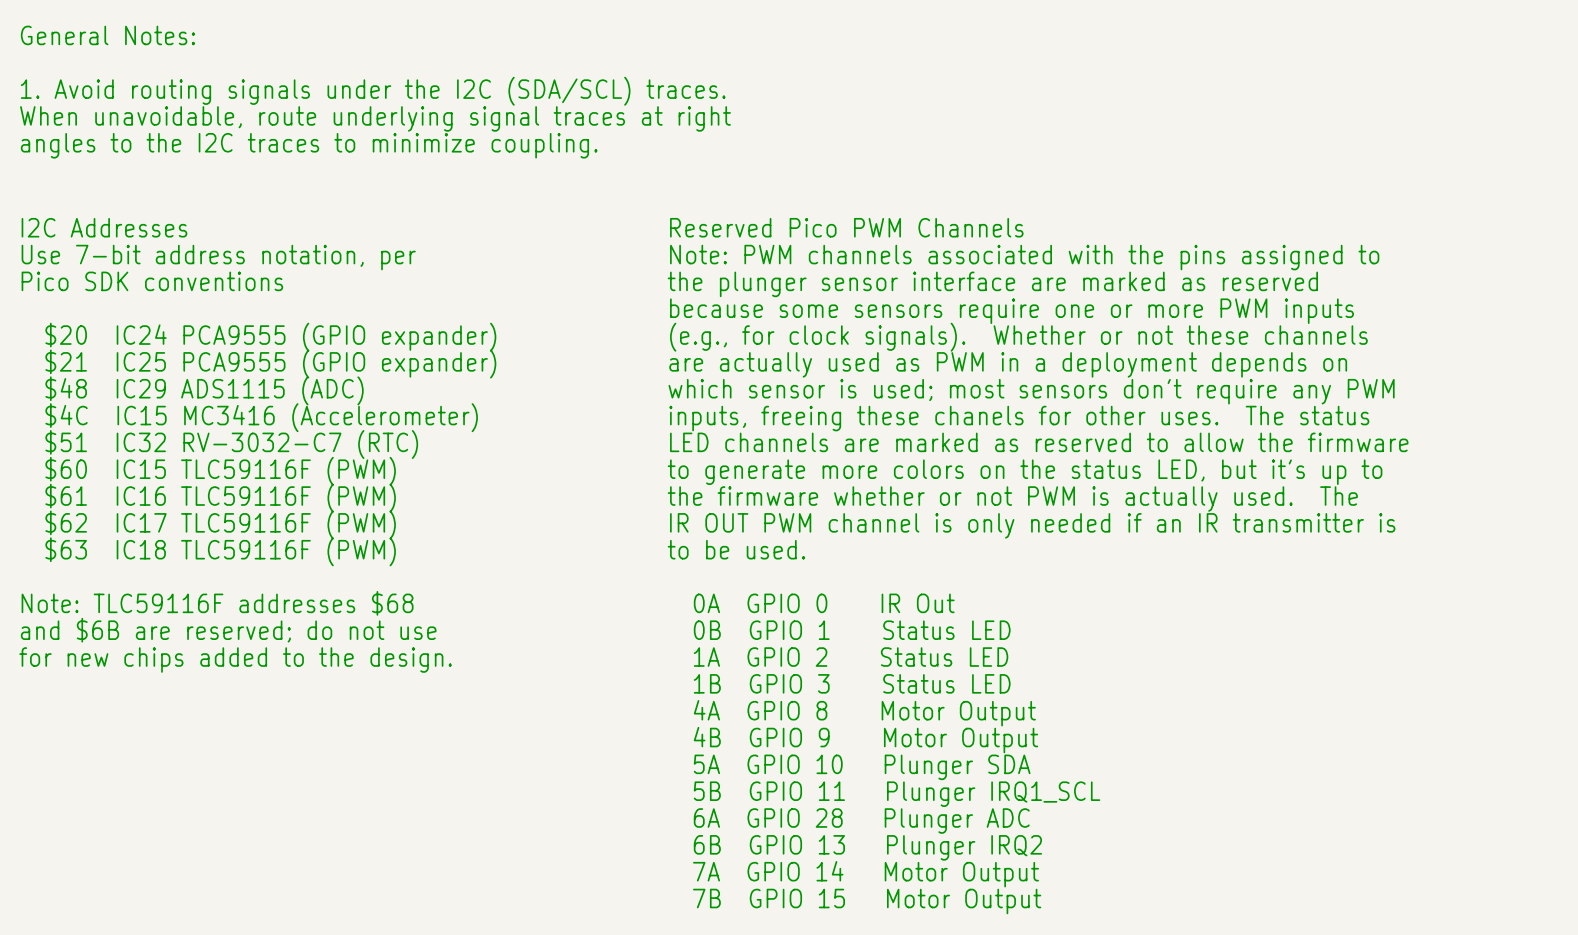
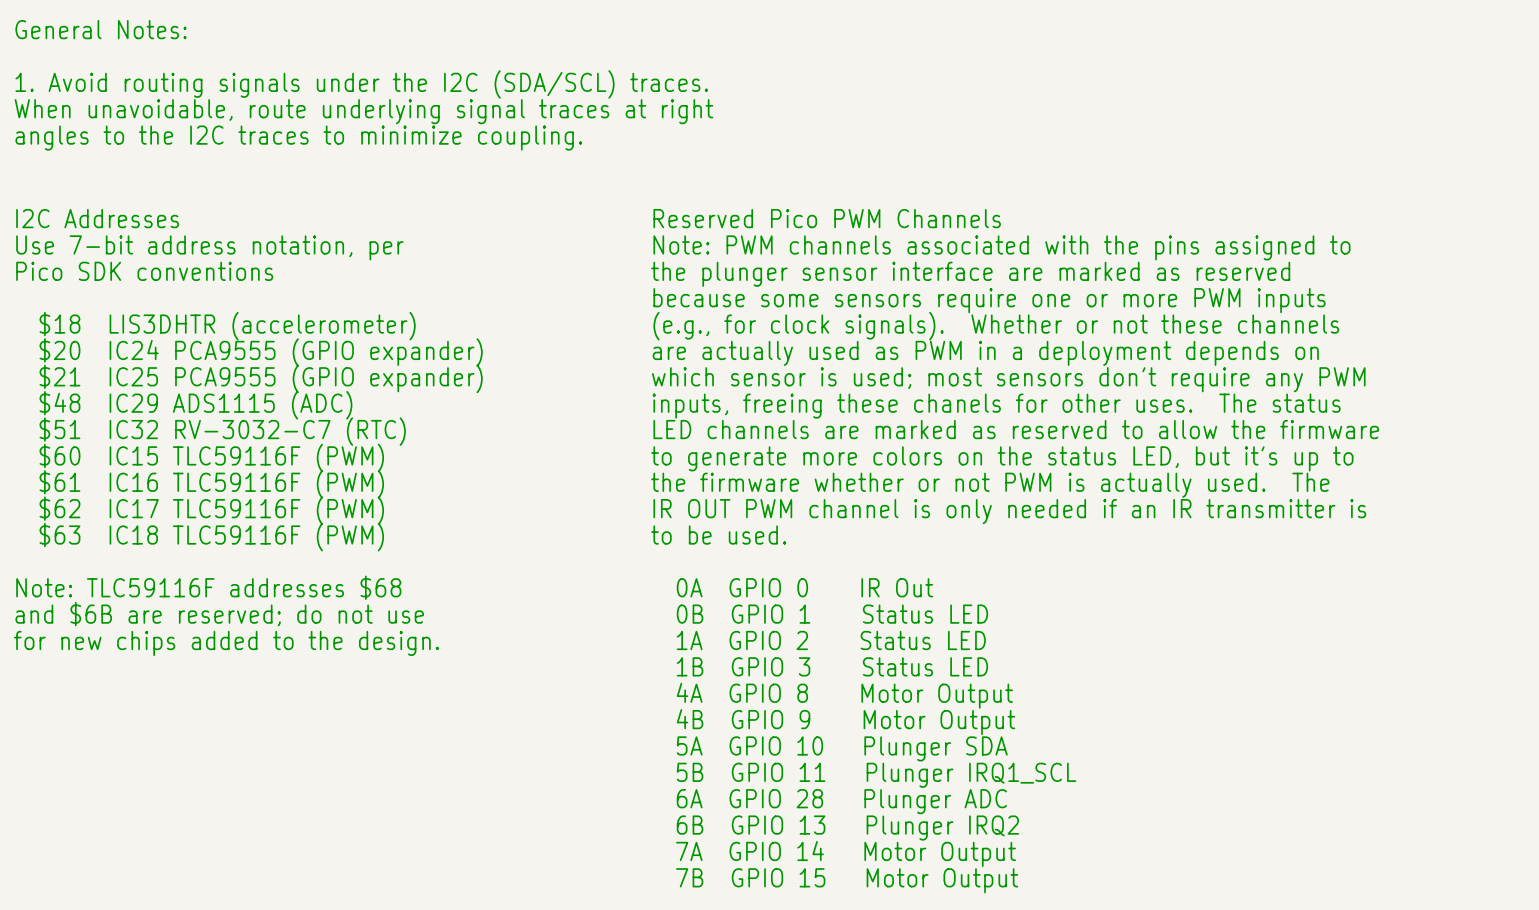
text: $20 IC24 PCA9555 (GPIO expander) (270, 337) -> $18 LIS3DHTR (accelerometer) (227, 326)
text: $21 IC25 PCA9555 (GPIO expander) (270, 364) -> $20 IC24 PCA9555 (GPIO expander) (261, 352)
text: $48 IC29 ADS1115 (ADC) (204, 390) -> $21 IC25 PCA9555 (GPIO expander) (261, 378)
text: $4C IC15 MC3416 (Accelerometer) (261, 417) -> $48 IC29 ADS1115 (ADC) (195, 405)

